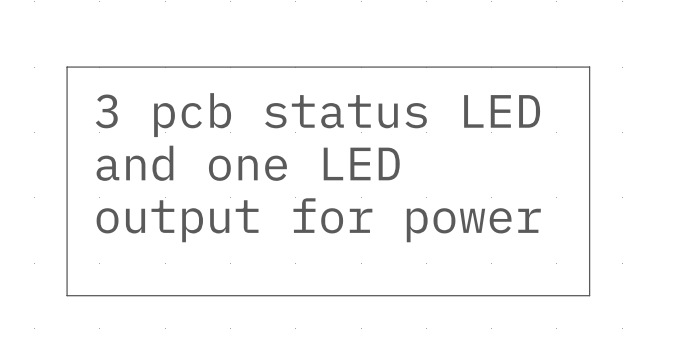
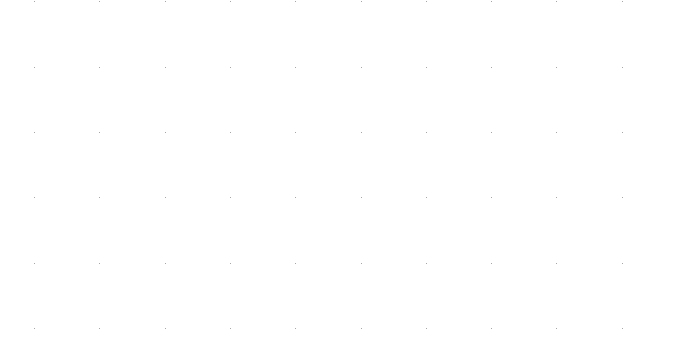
line: (67, 67) (589, 67) (589, 295) (67, 295) (67, 67) -> none
text: 3 pcb status LED (317, 115) -> none
text: and one LED (248, 163) -> none
text: output for power (318, 220) -> none

